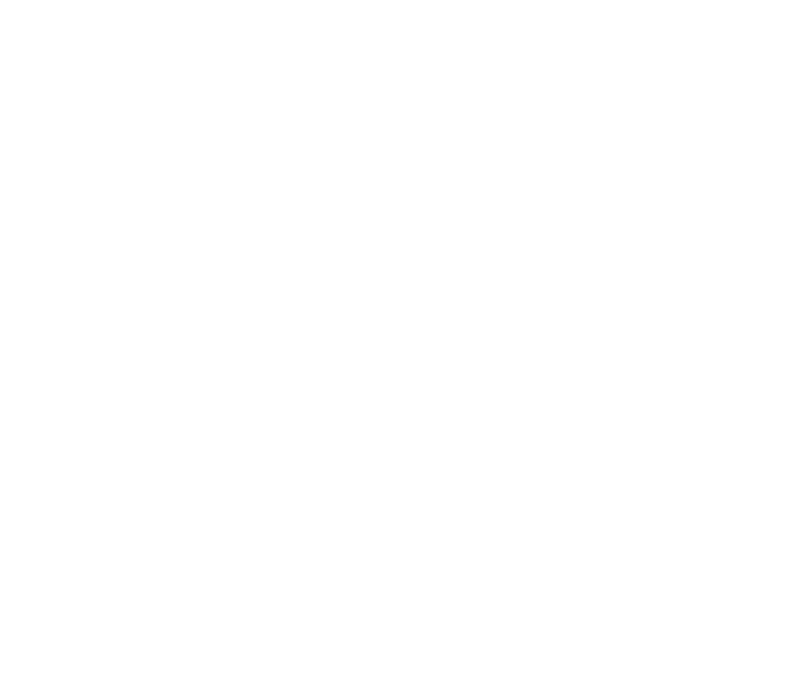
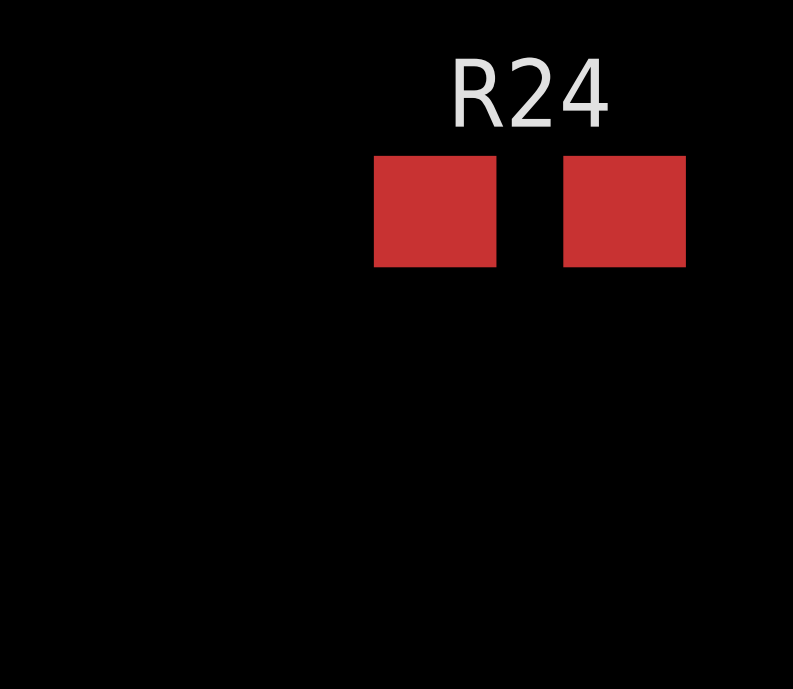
R24: none -> (529, 211)

